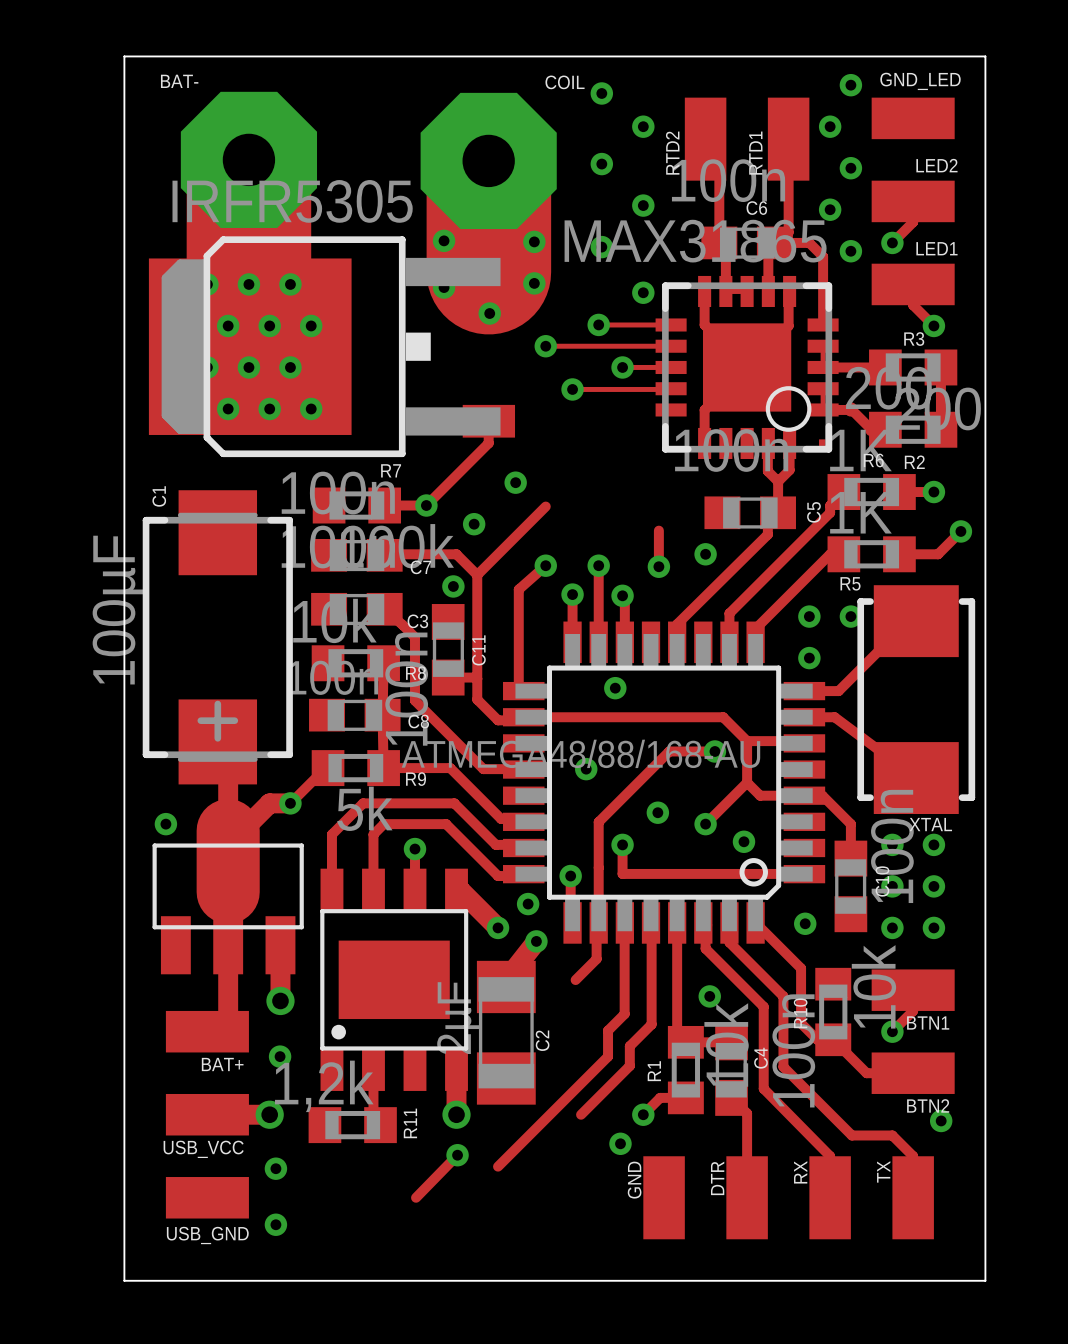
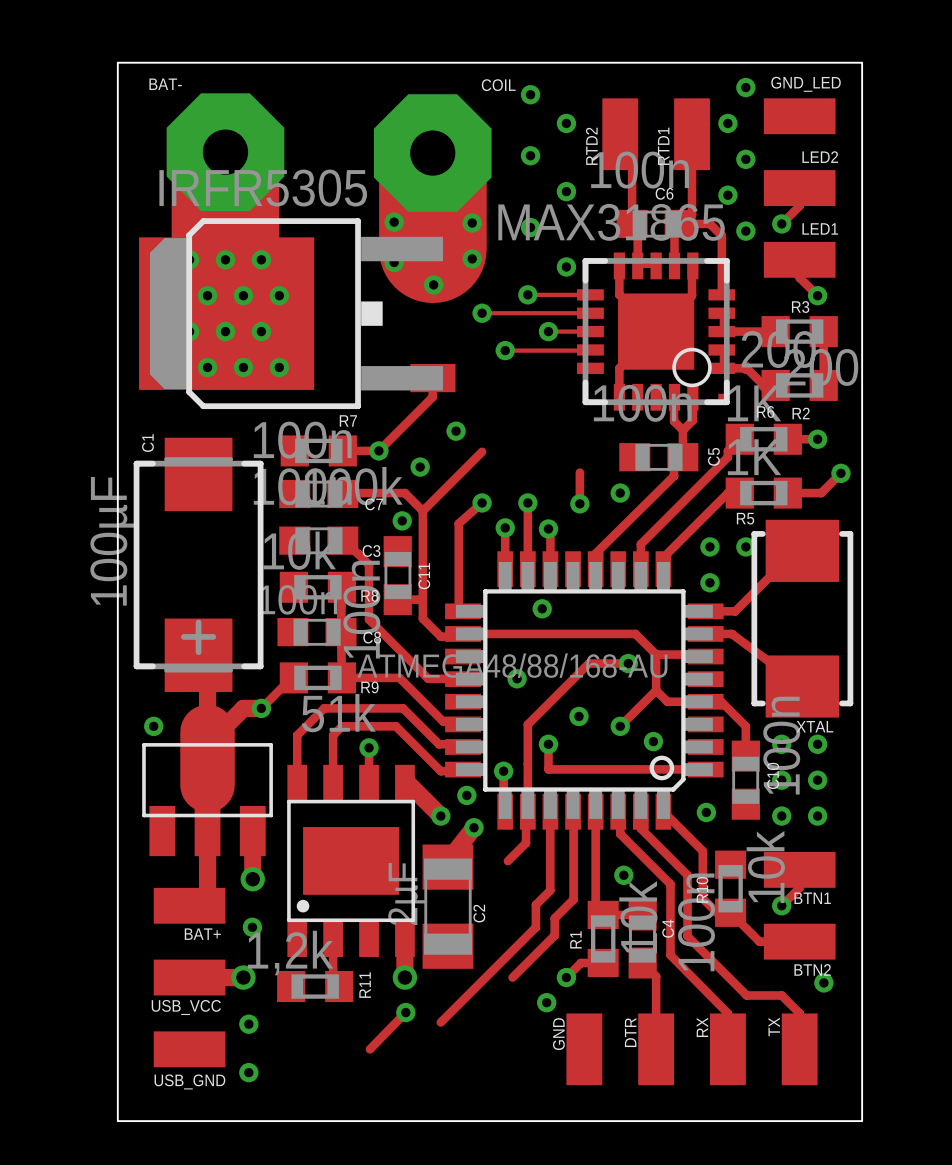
R9 value: 5k (364, 808) -> 51k (338, 713)

